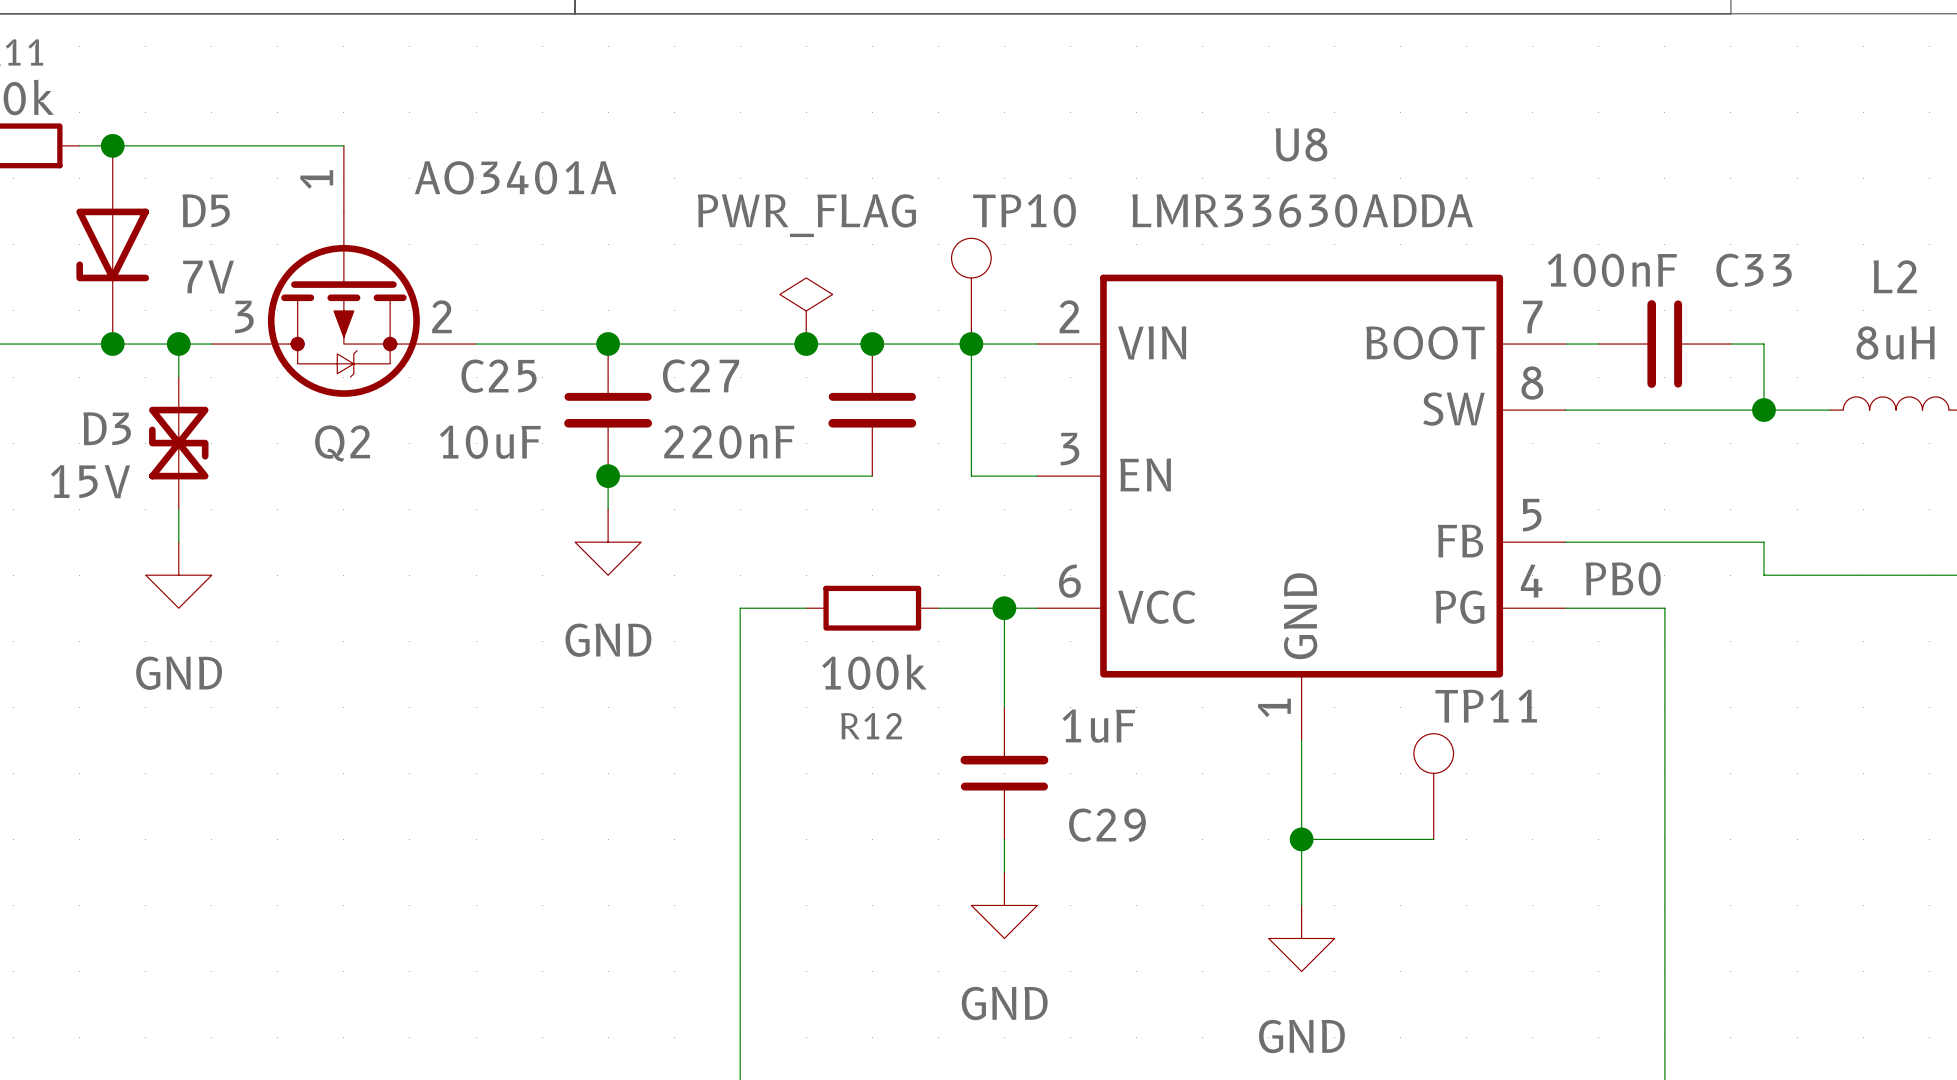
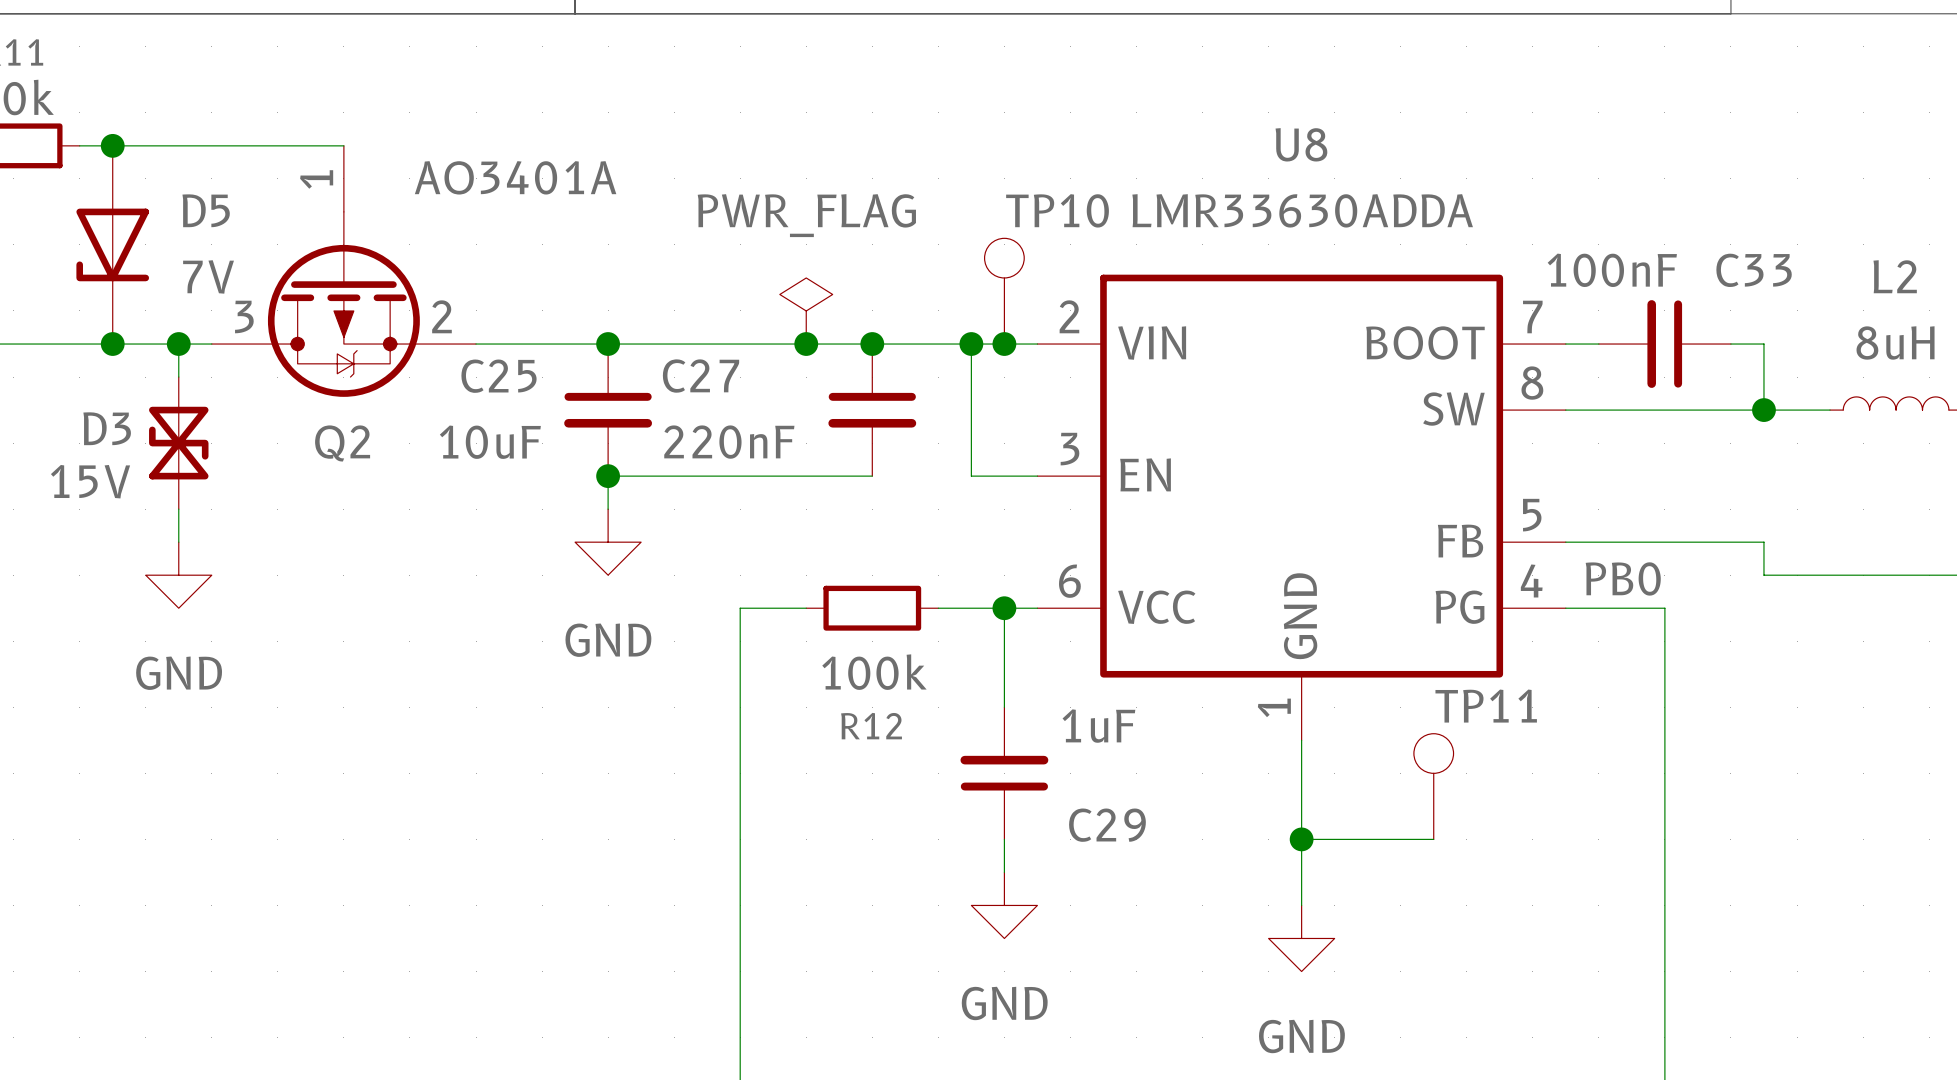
TP10 position: (971, 291) -> (1004, 291)
junction: none -> (1004, 344)

